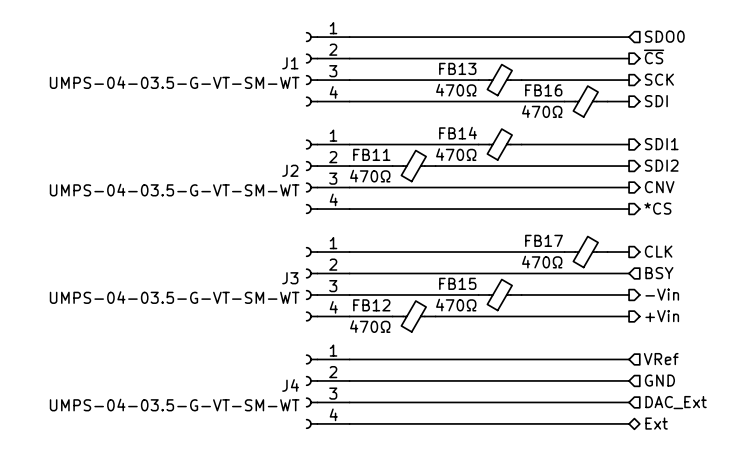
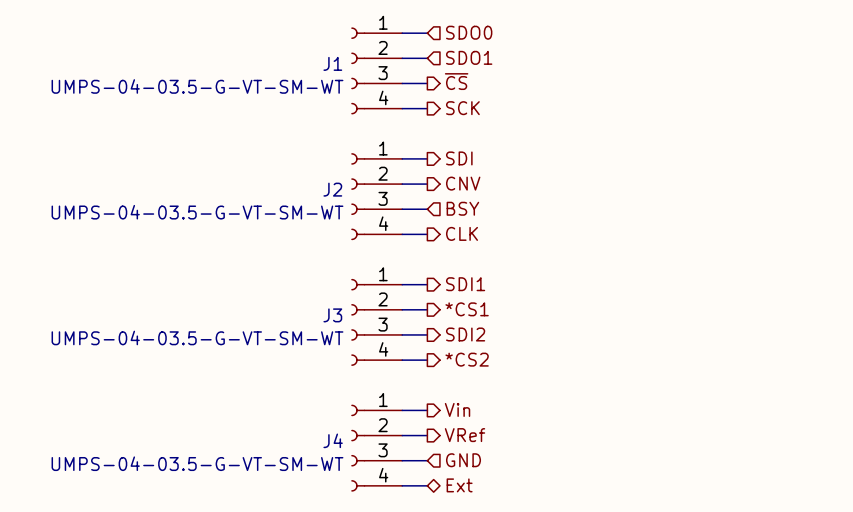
hierarchical label: none -> SDO0 (469, 32)
hierarchical label: SDO0 (664, 36) -> none
wire: (371, 37) (629, 37) -> none
hierarchical label: ~{CS} (654, 56) -> none
wire: (371, 58) (629, 58) -> none
hierarchical label: none -> SDO1 (469, 57)
hierarchical label: none -> ~{CS} (456, 81)
hierarchical label: SCK (659, 79) -> none
wire: (371, 80) (478, 80) -> none
FB13: 470Ω (500, 80) -> none
wire: (521, 80) (629, 80) -> none
wire: (371, 101) (564, 101) -> none
hierarchical label: none -> SCK (462, 108)
FB16: 470Ω (586, 101) -> none
wire: (607, 101) (629, 101) -> none
hierarchical label: SDI (656, 101) -> none
wire: (371, 144) (478, 144) -> none
hierarchical label: none -> SDI (459, 158)
FB14: 470Ω (500, 144) -> none
wire: (521, 144) (629, 144) -> none
hierarchical label: SDI1 (661, 144) -> none
hierarchical label: none -> CNV (463, 183)
hierarchical label: SDI2 (661, 165) -> none
wire: (371, 166) (392, 166) -> none
FB11: 470Ω (414, 166) -> none
wire: (435, 166) (629, 166) -> none
wire: (371, 187) (629, 187) -> none
hierarchical label: none -> BSY (462, 208)
hierarchical label: CNV (659, 187) -> none
hierarchical label: none -> CLK (462, 233)
hierarchical label: *CS (657, 208) -> none
wire: (371, 209) (629, 209) -> none
hierarchical label: none -> SDI1 (465, 284)
hierarchical label: CLK (658, 251) -> none
wire: (371, 252) (564, 252) -> none
FB17: 470Ω (586, 252) -> none
wire: (607, 252) (629, 252) -> none
wire: (371, 273) (629, 273) -> none
hierarchical label: none -> *CS1 (467, 309)
hierarchical label: BSY (659, 273) -> none
wire: (371, 294) (478, 294) -> none
hierarchical label: none -> SDI2 (465, 334)
FB15: 470Ω (500, 294) -> none
wire: (521, 294) (629, 294) -> none
hierarchical label: -Vin (662, 294) -> none
wire: (371, 316) (392, 316) -> none
hierarchical label: none -> *CS2 (467, 359)
FB12: 470Ω (414, 316) -> none
wire: (435, 316) (629, 316) -> none
hierarchical label: +Vin (662, 316) -> none
wire: (371, 359) (629, 359) -> none
hierarchical label: none -> Vin (457, 409)
hierarchical label: VRef (661, 359) -> none
wire: (371, 380) (629, 380) -> none
hierarchical label: none -> VRef (465, 435)
hierarchical label: GND (659, 380) -> none
wire: (371, 402) (629, 402) -> none
hierarchical label: none -> GND (463, 460)
hierarchical label: DAC_Ext (676, 402) -> none
wire: (371, 423) (629, 423) -> none
hierarchical label: none -> Ext (459, 485)
hierarchical label: Ext (656, 423) -> none

